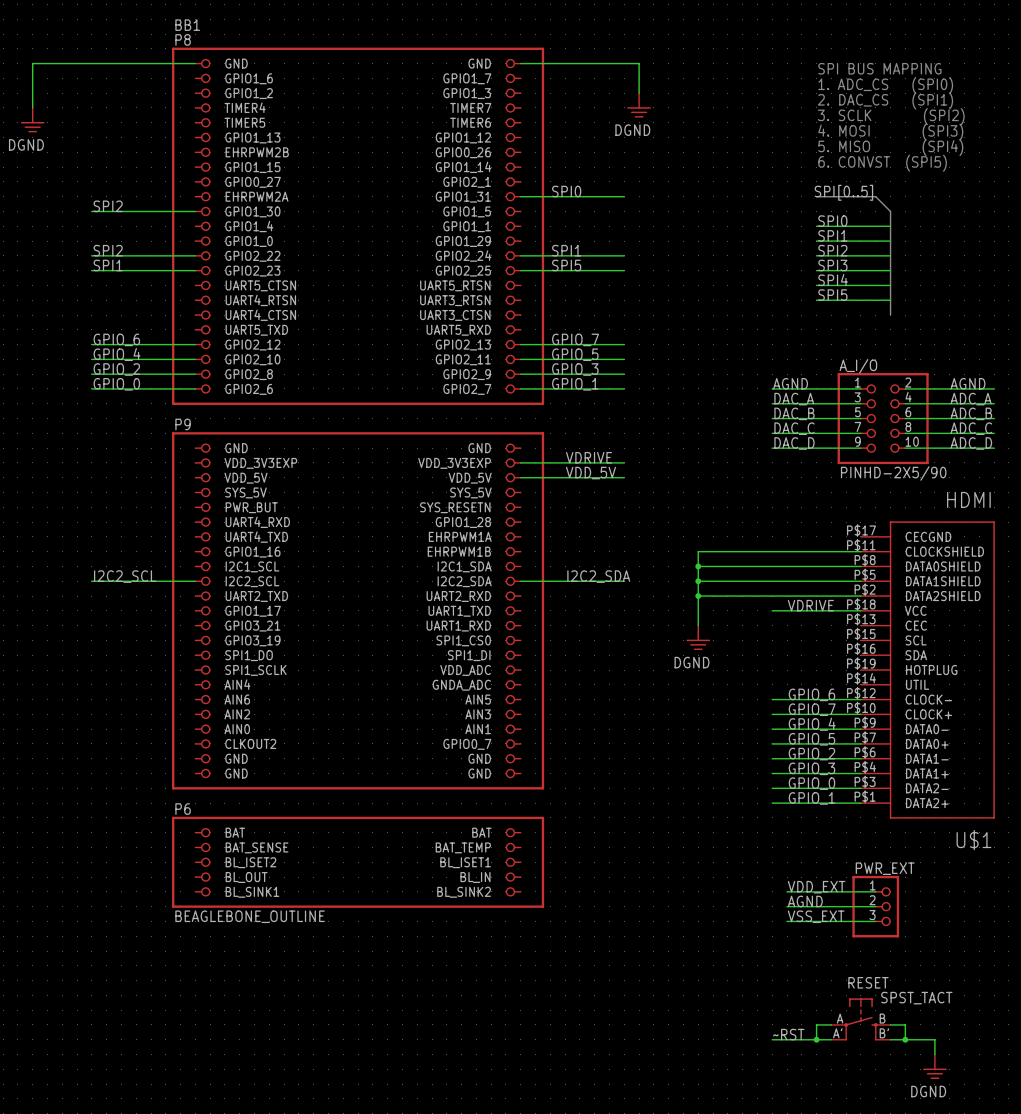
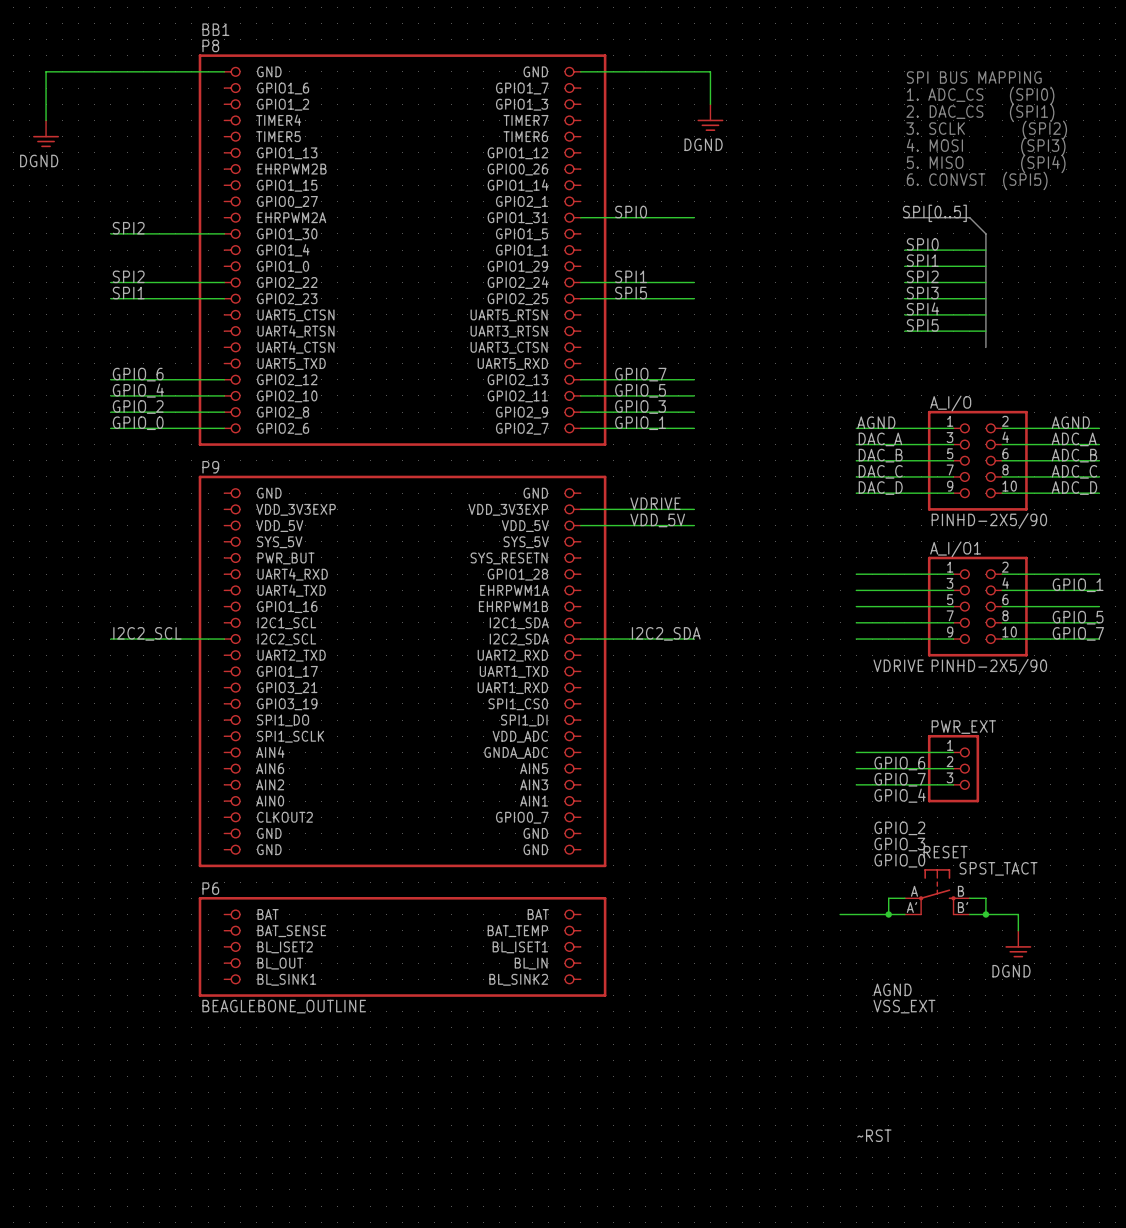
wire: none -> (856, 574) (953, 574)
label: none -> GPIO_1 (1078, 585)
wire: none -> (1002, 590) (1099, 590)
wire: (772, 551) (698, 551) (698, 625) -> none
A_I/O1: none -> PINHD-2X5/90 (977, 606)
wire: none -> (1002, 606) (1099, 606)
label: none -> GPIO_5 (1078, 617)
wire: (698, 566) (772, 566) -> none
junction: (698, 566) -> none
wire: none -> (1002, 622) (1099, 622)
label: none -> GPIO_7 (1078, 633)
wire: (698, 581) (772, 581) -> none
junction: (698, 581) -> none
wire: none -> (1002, 639) (1099, 639)
wire: (698, 596) (860, 596) -> none
junction: (698, 596) -> none
wire: (772, 610) (860, 610) -> (856, 590) (953, 590)
power symbol: DGND (698, 637) -> none
U$1: HDMI (927, 670) -> none
PWR_EXT: none -> (953, 768)
wire: (772, 729) (860, 729) -> none
label: GPIO_5 (811, 739) -> none
wire: (772, 743) (860, 743) -> none
wire: (772, 758) (860, 758) -> (856, 752) (953, 752)
wire: (772, 773) (860, 773) -> none
wire: (772, 788) (860, 788) -> none
label: GPIO_1 (811, 798) -> none
wire: (772, 803) (860, 803) -> none
RESET: none -> SPST_TACT (937, 892)
wire: none -> (904, 898) (888, 898) (888, 914)
wire: none -> (969, 898) (985, 898) (985, 914)
wire: none -> (840, 914) (904, 914)
junction: none -> (888, 914)
wire: none -> (969, 914) (1018, 914) (1018, 930)
junction: none -> (985, 914)
power symbol: none -> DGND (1018, 944)
label: VDD_EXT (816, 887) -> none
wire: (787, 891) (875, 891) -> none
wire: (787, 906) (875, 906) -> none
PWR_EXT: (875, 906) -> none
wire: (787, 921) (875, 921) -> none
RESET: SPST_TACT (860, 1019) -> none
wire: (831, 1024) (816, 1024) (816, 1039) -> none
wire: (890, 1024) (905, 1024) (905, 1039) -> none
wire: (772, 1039) (831, 1039) -> none
junction: (816, 1039) -> none
wire: (890, 1039) (934, 1039) (934, 1054) -> none
junction: (905, 1039) -> none
power symbol: DGND (934, 1066) -> none

